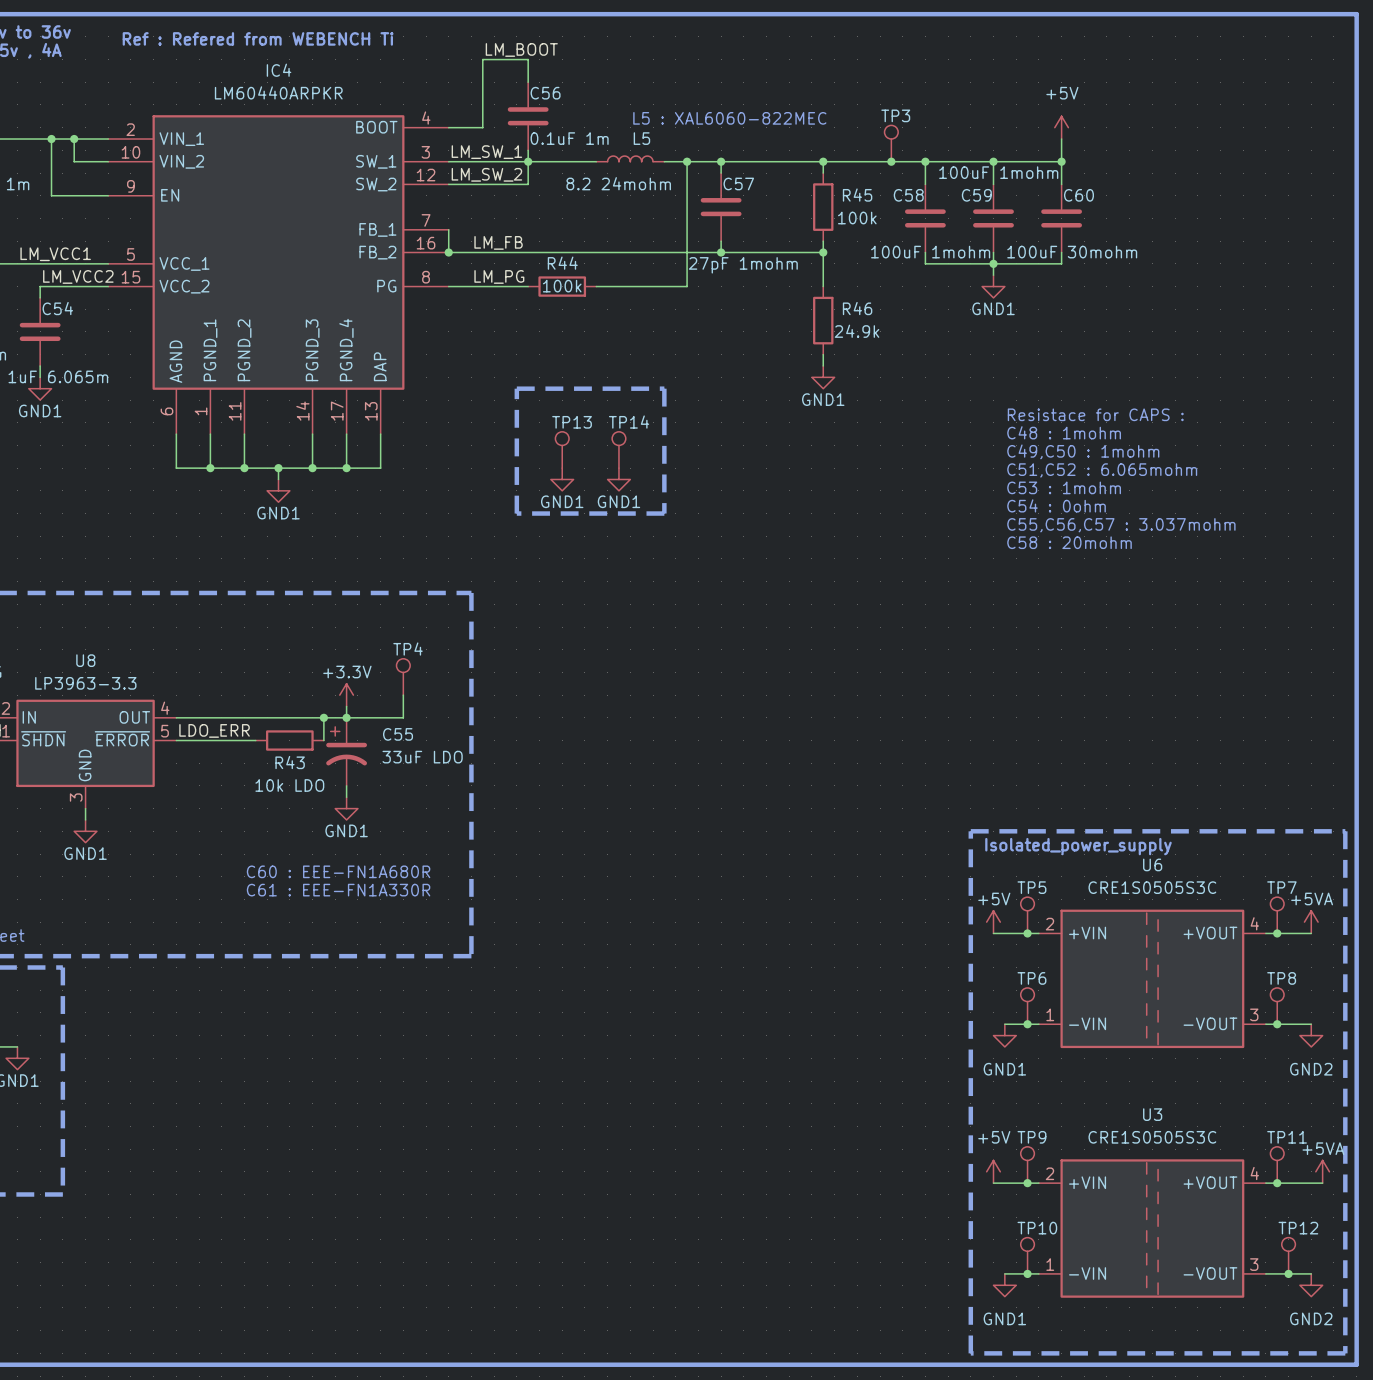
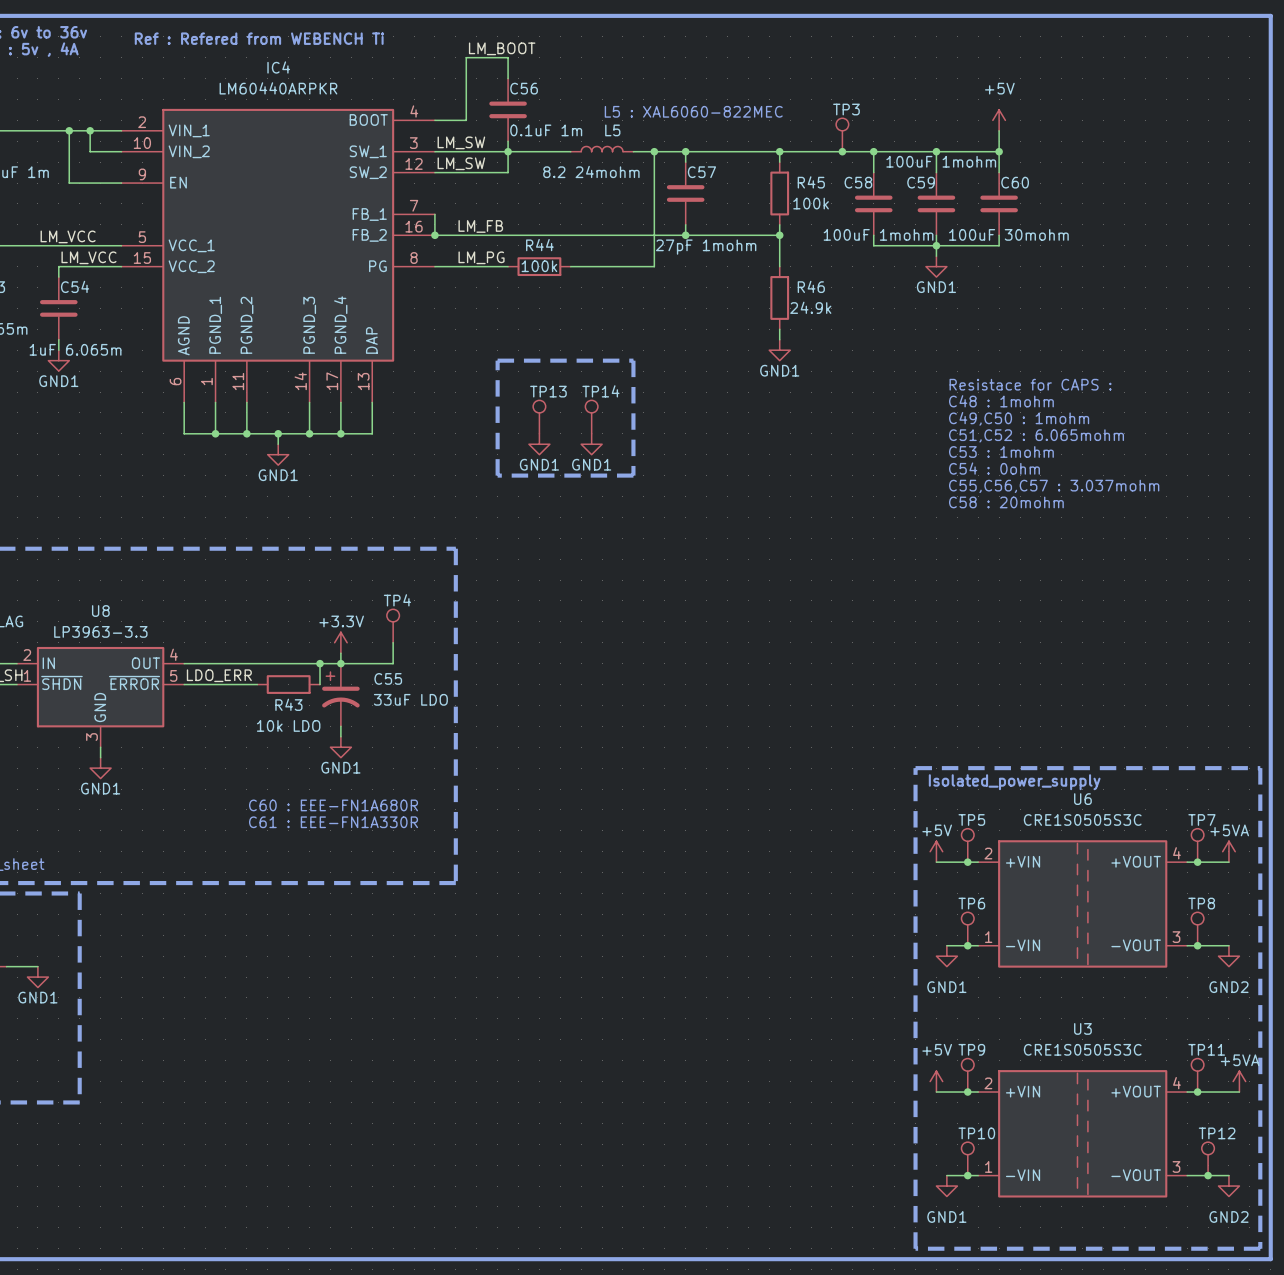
label: LM_SW_1 (486, 152) -> LM_SW (461, 142)
label: LM_SW_2 (486, 174) -> LM_SW (461, 163)
label: LM_VCC1 (55, 254) -> LM_VCC (68, 236)
label: LM_VCC2 (78, 276) -> LM_VCC (88, 257)

